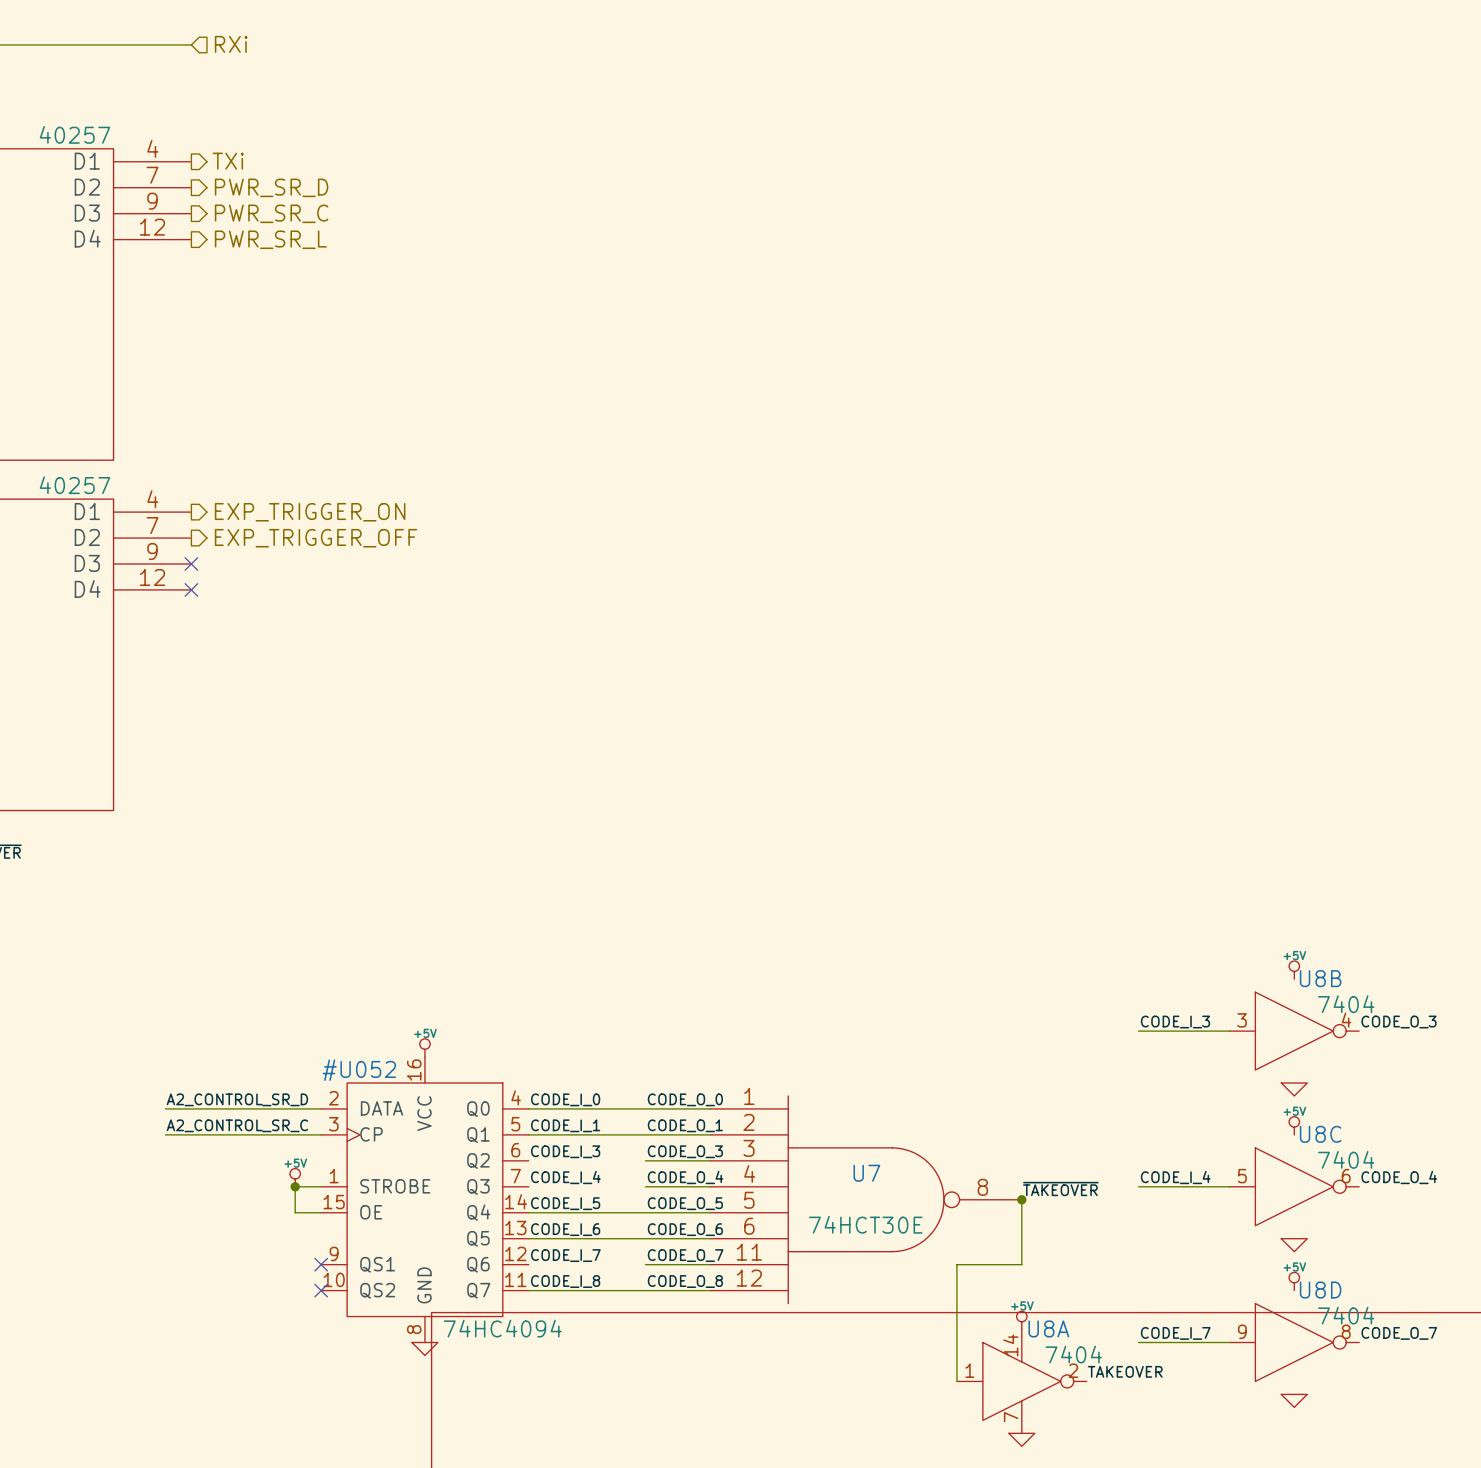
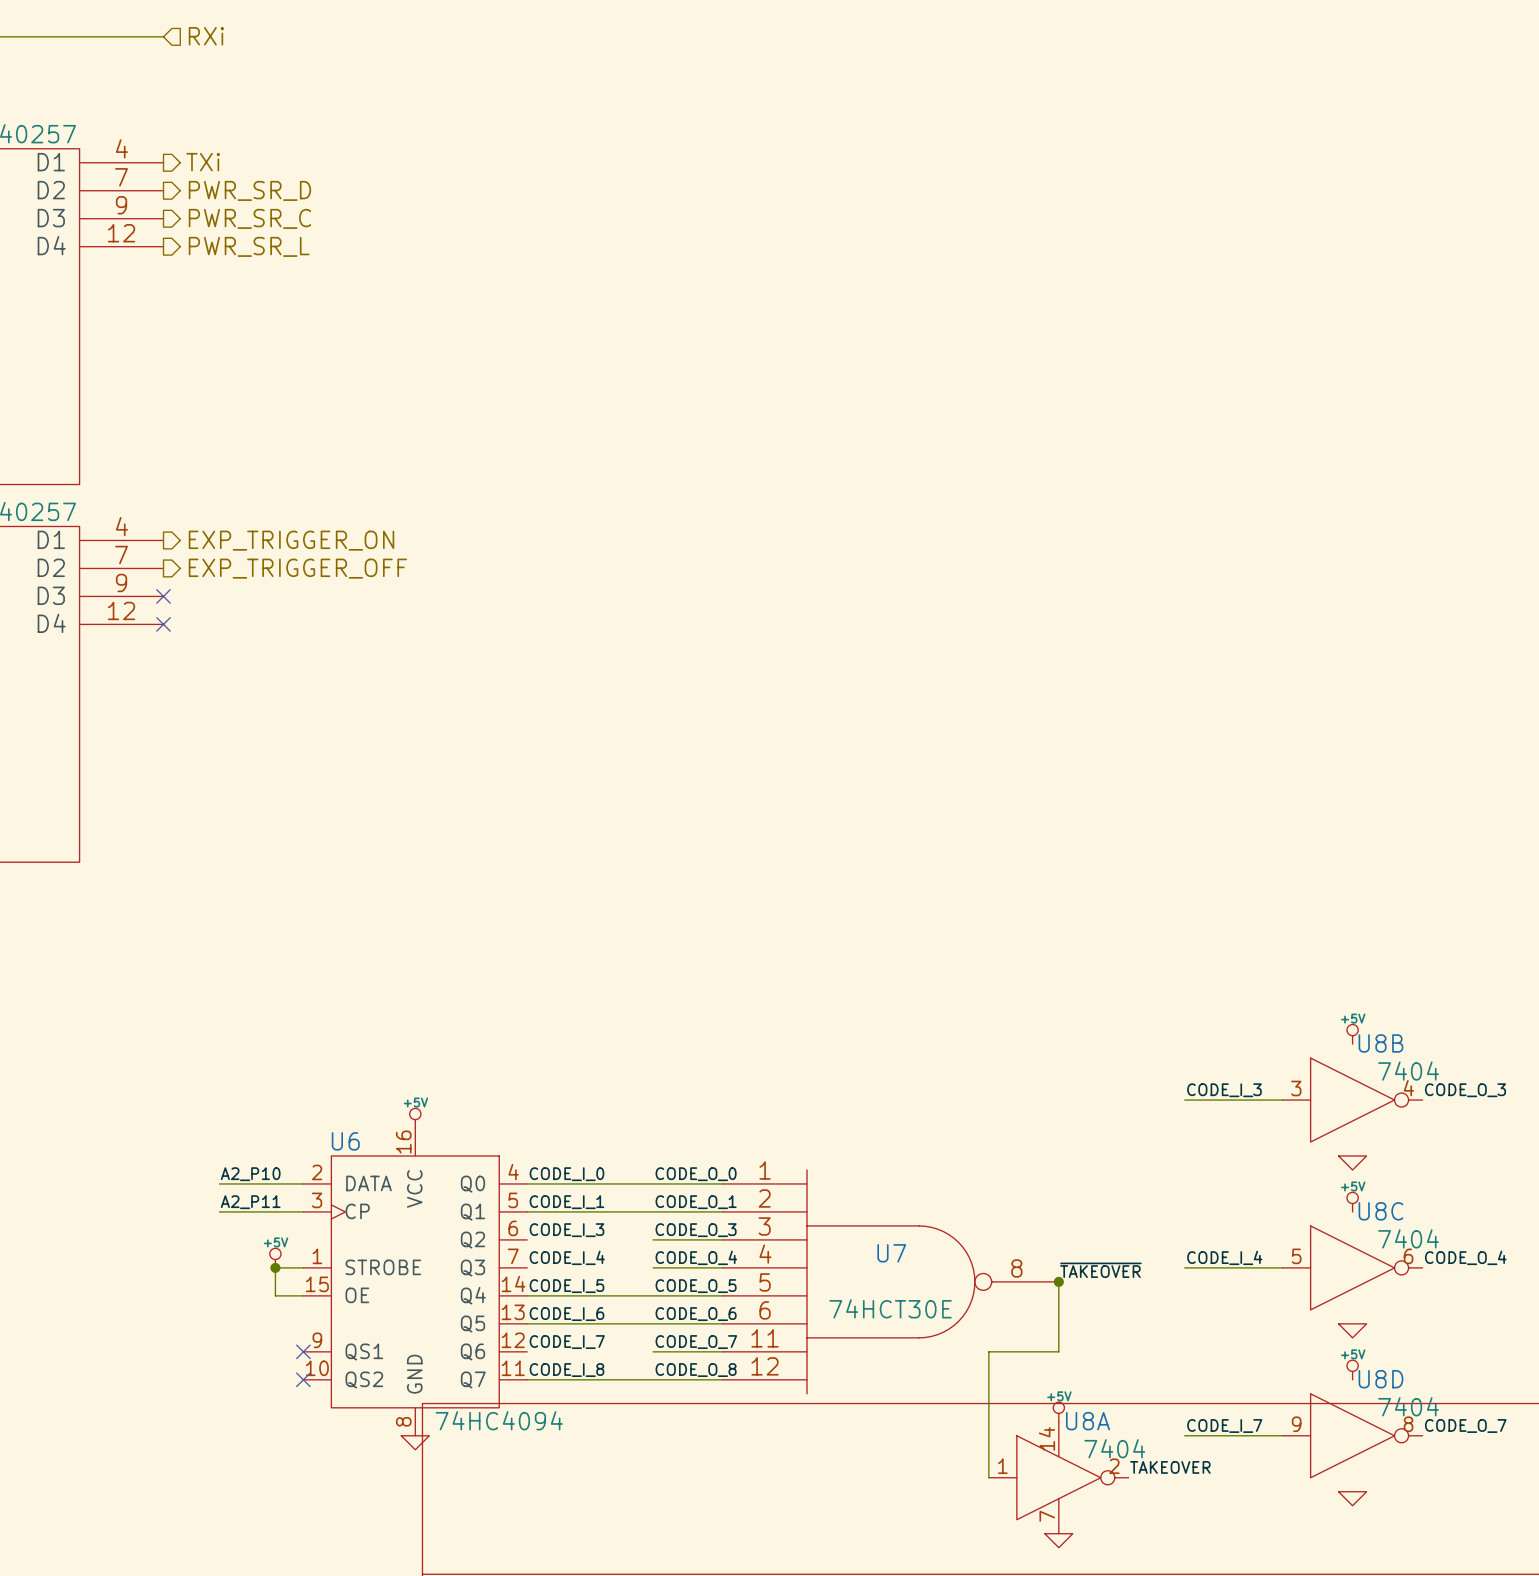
drawing: [321, 1057, 529, 1343] -> none
label: A2_CONTROL_SR_D (237, 1099) -> none
label: none -> A2_P10 (250, 1174)
wire: (165, 1108) (243, 1108) -> none
label: A2_CONTROL_SR_C (237, 1125) -> none
label: none -> A2_P11 (250, 1202)
wire: (165, 1134) (243, 1134) -> none
U6: none -> 74HC4094 (415, 1281)

